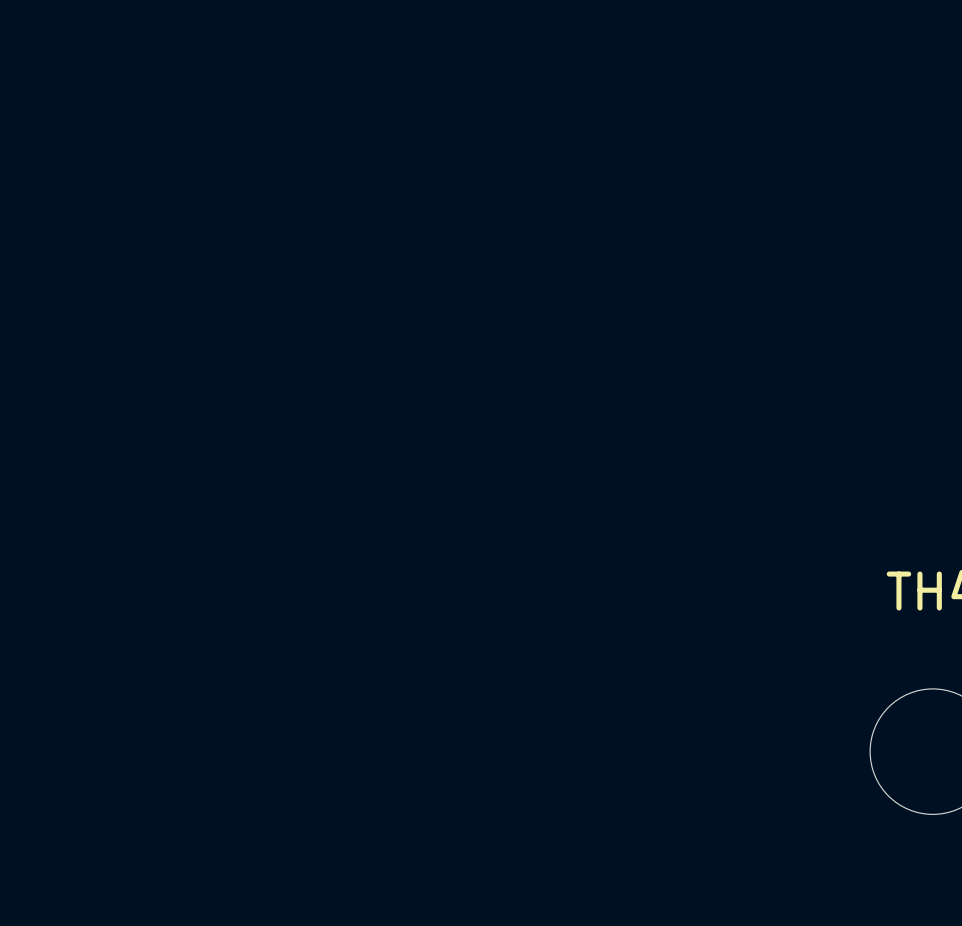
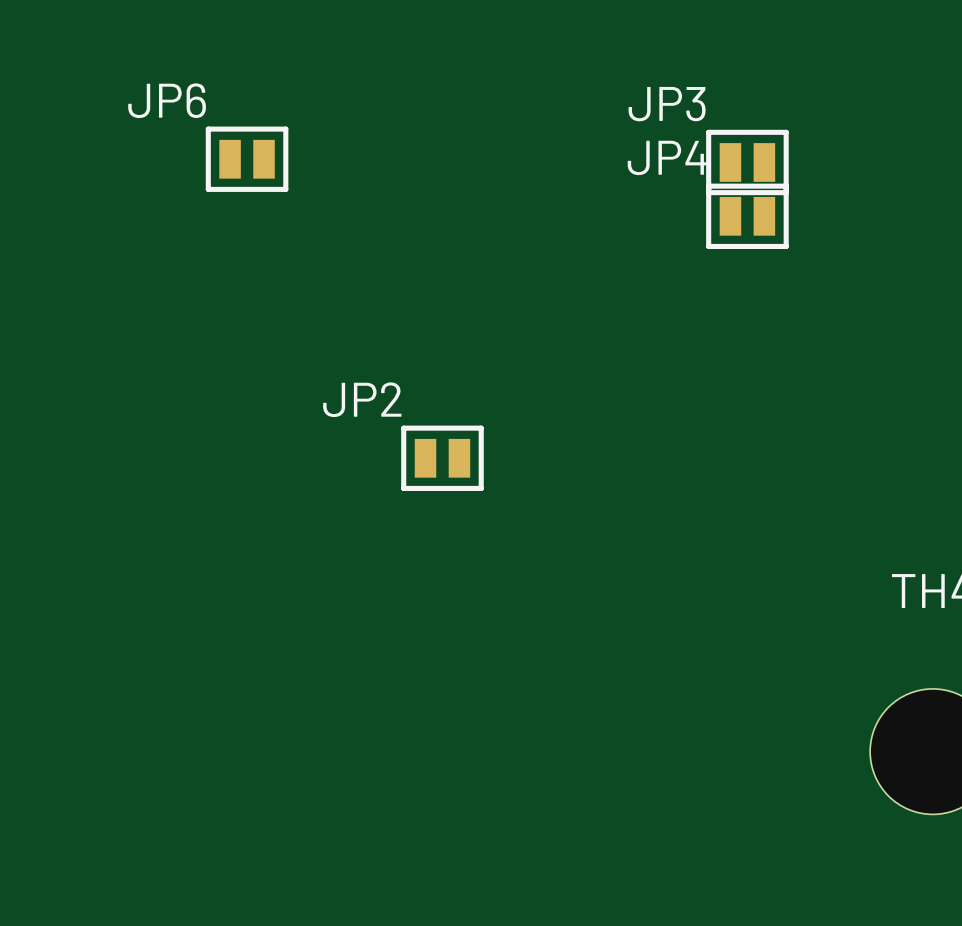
JP6: none -> (247, 159)
JP3: none -> (747, 162)
JP4: none -> (747, 216)
JP2: none -> (442, 458)

